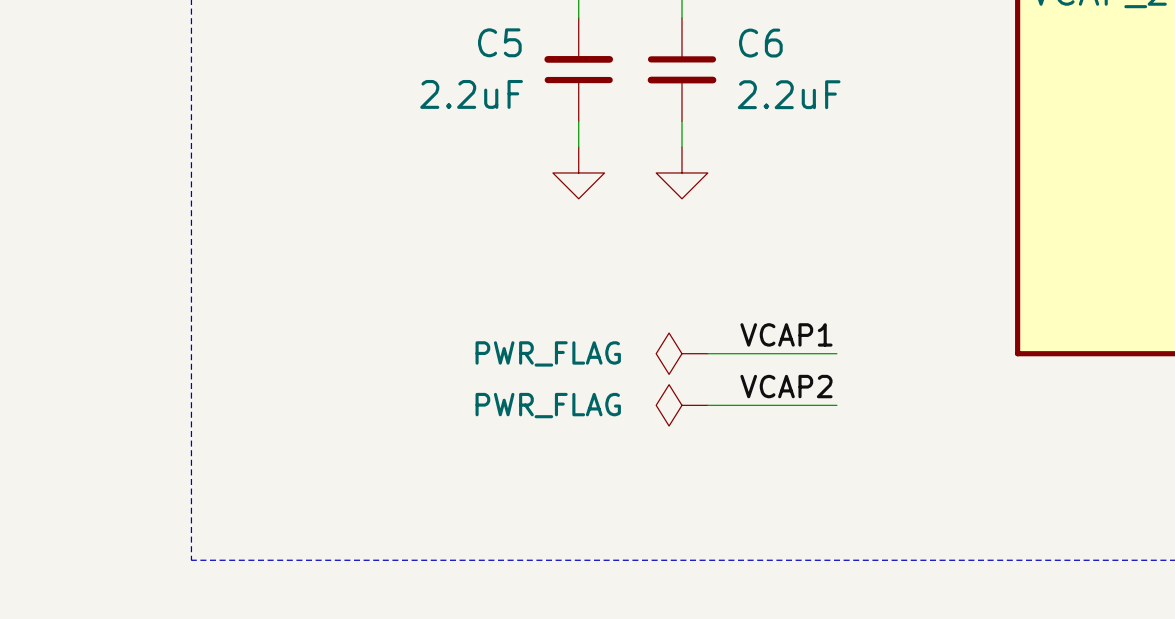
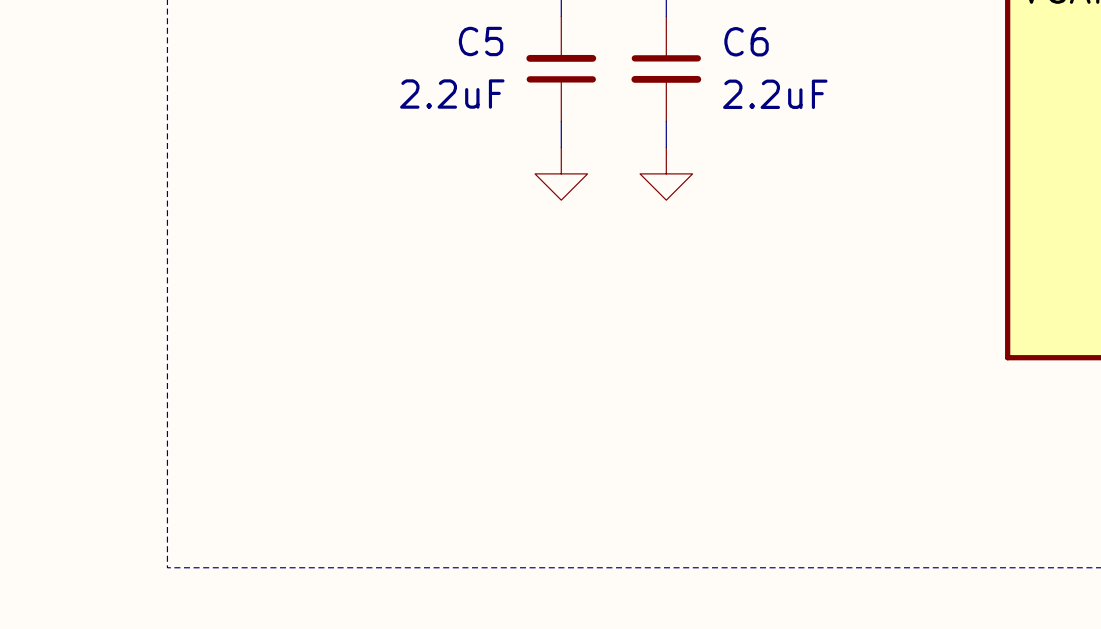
label: VCAP1 (786, 334) -> none
power symbol: PWR_FLAG (681, 353) -> none
wire: (707, 353) (836, 353) -> none
label: VCAP2 (786, 386) -> none
power symbol: PWR_FLAG (681, 405) -> none
wire: (707, 405) (836, 405) -> none

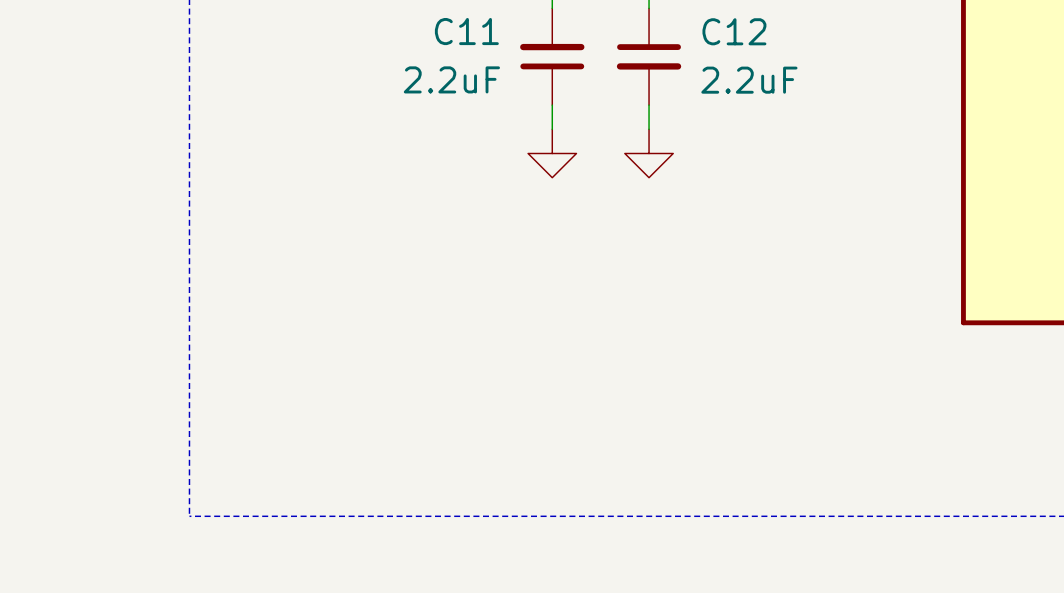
C5 name: C5 (481, 41) -> C11 (466, 31)
C6 name: C6 (746, 41) -> C12 (734, 31)

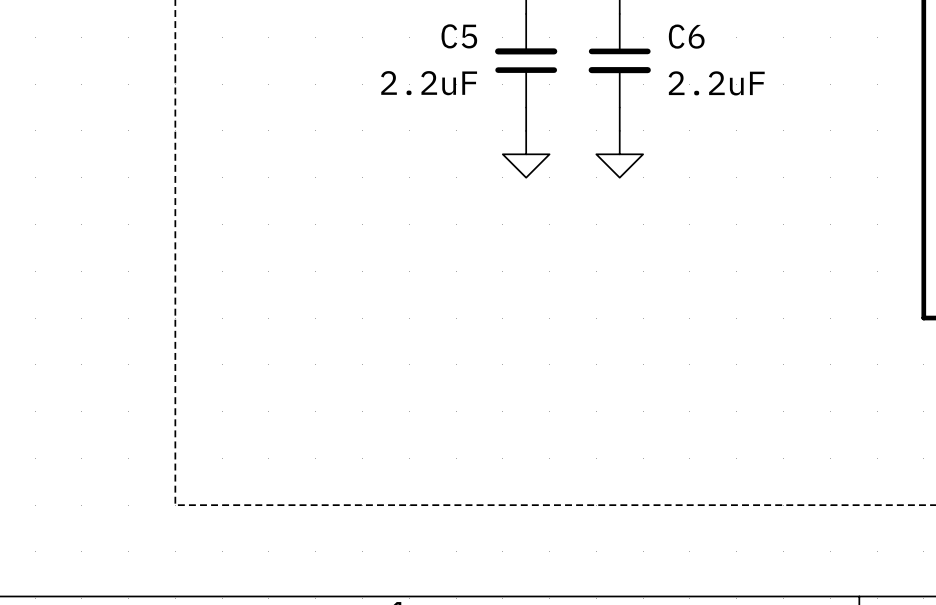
C11 name: C11 (466, 31) -> C5 (459, 36)
C12 name: C12 (734, 31) -> C6 (686, 36)

